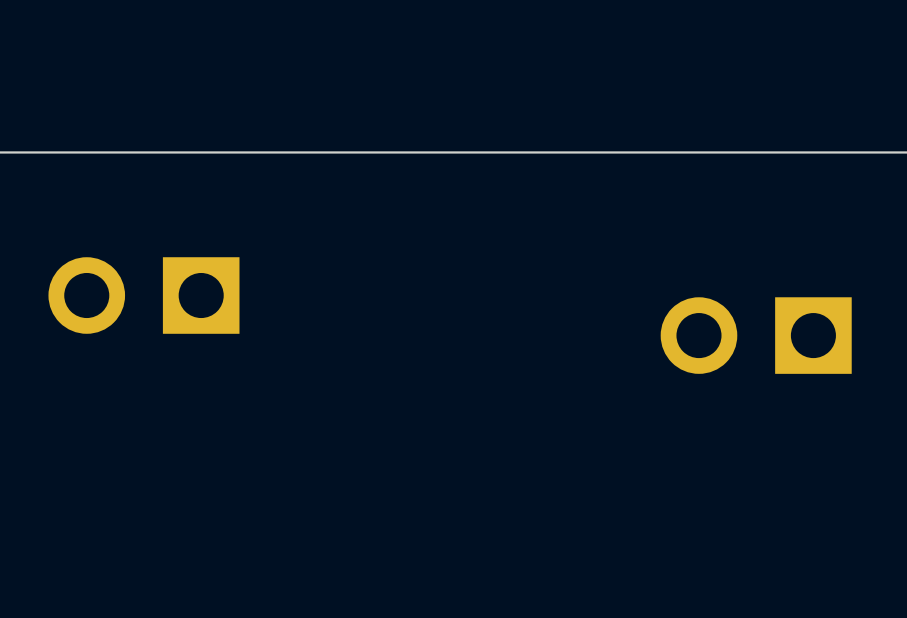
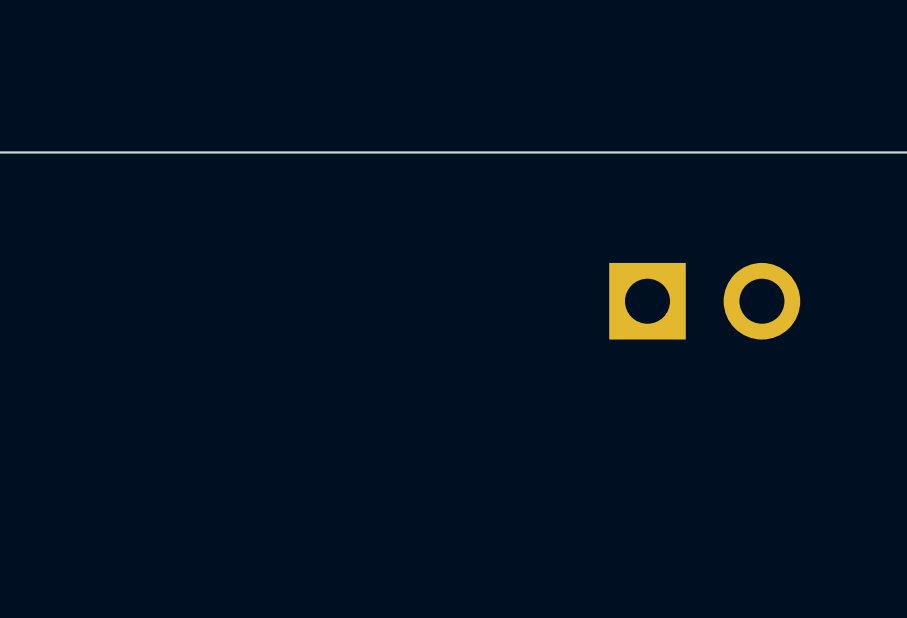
part: (143, 295) -> none
part rotation: 0° (756, 335) -> 180° (704, 301)

